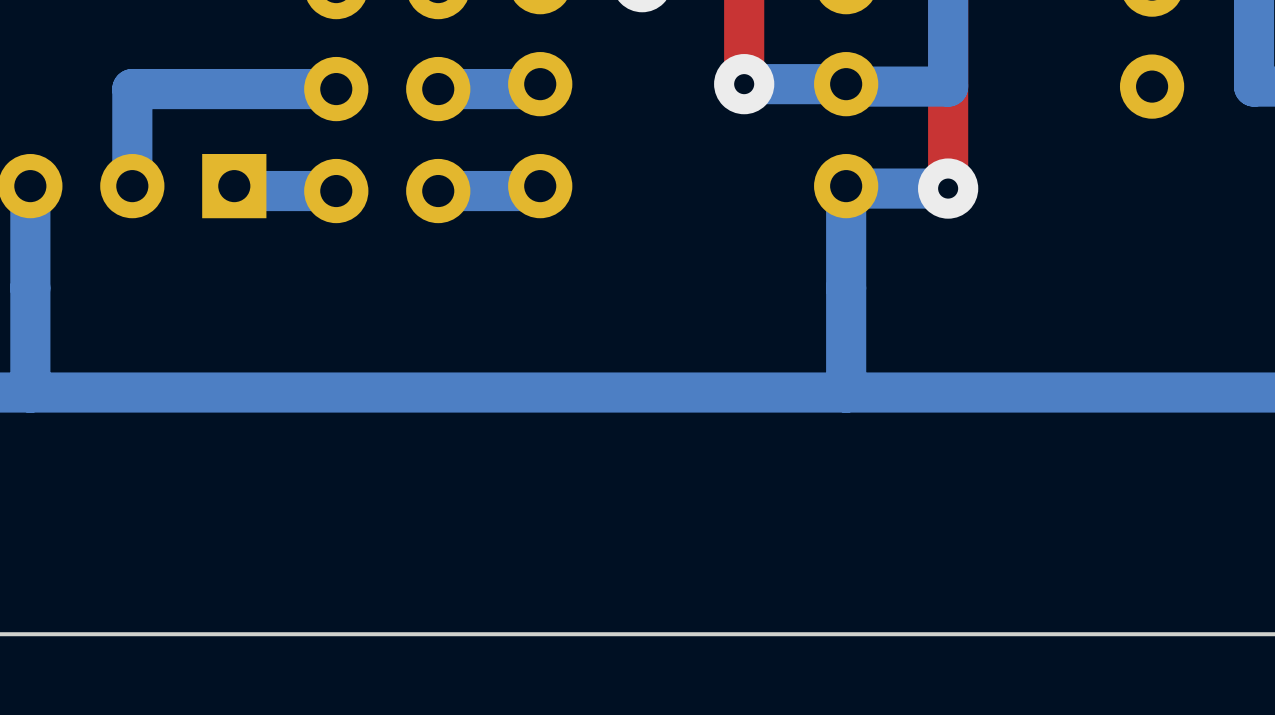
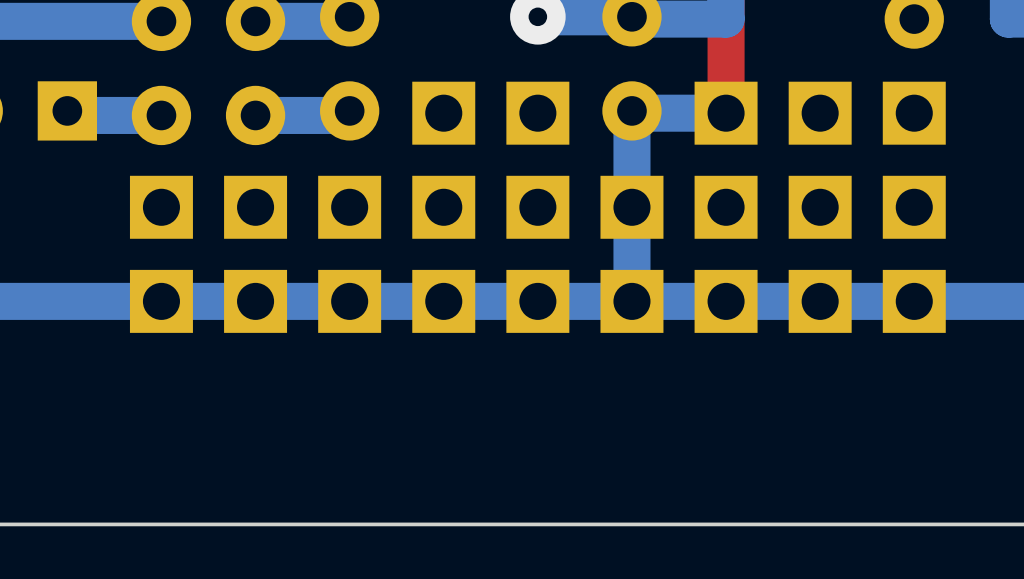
part: none -> (443, 113)
part: none -> (537, 113)
part: none -> (726, 113)
part: none -> (820, 113)
part: none -> (914, 113)
part: none -> (161, 207)
part: none -> (255, 207)
part: none -> (349, 207)
part: none -> (443, 207)
part: none -> (537, 207)
part: none -> (631, 207)
part: none -> (726, 207)
part: none -> (820, 207)
part: none -> (914, 207)
part: none -> (161, 301)
part: none -> (255, 301)
part: none -> (349, 301)
part: none -> (443, 301)
part: none -> (537, 301)
part: none -> (631, 301)
part: none -> (726, 301)
part: none -> (820, 301)
part: none -> (914, 301)

